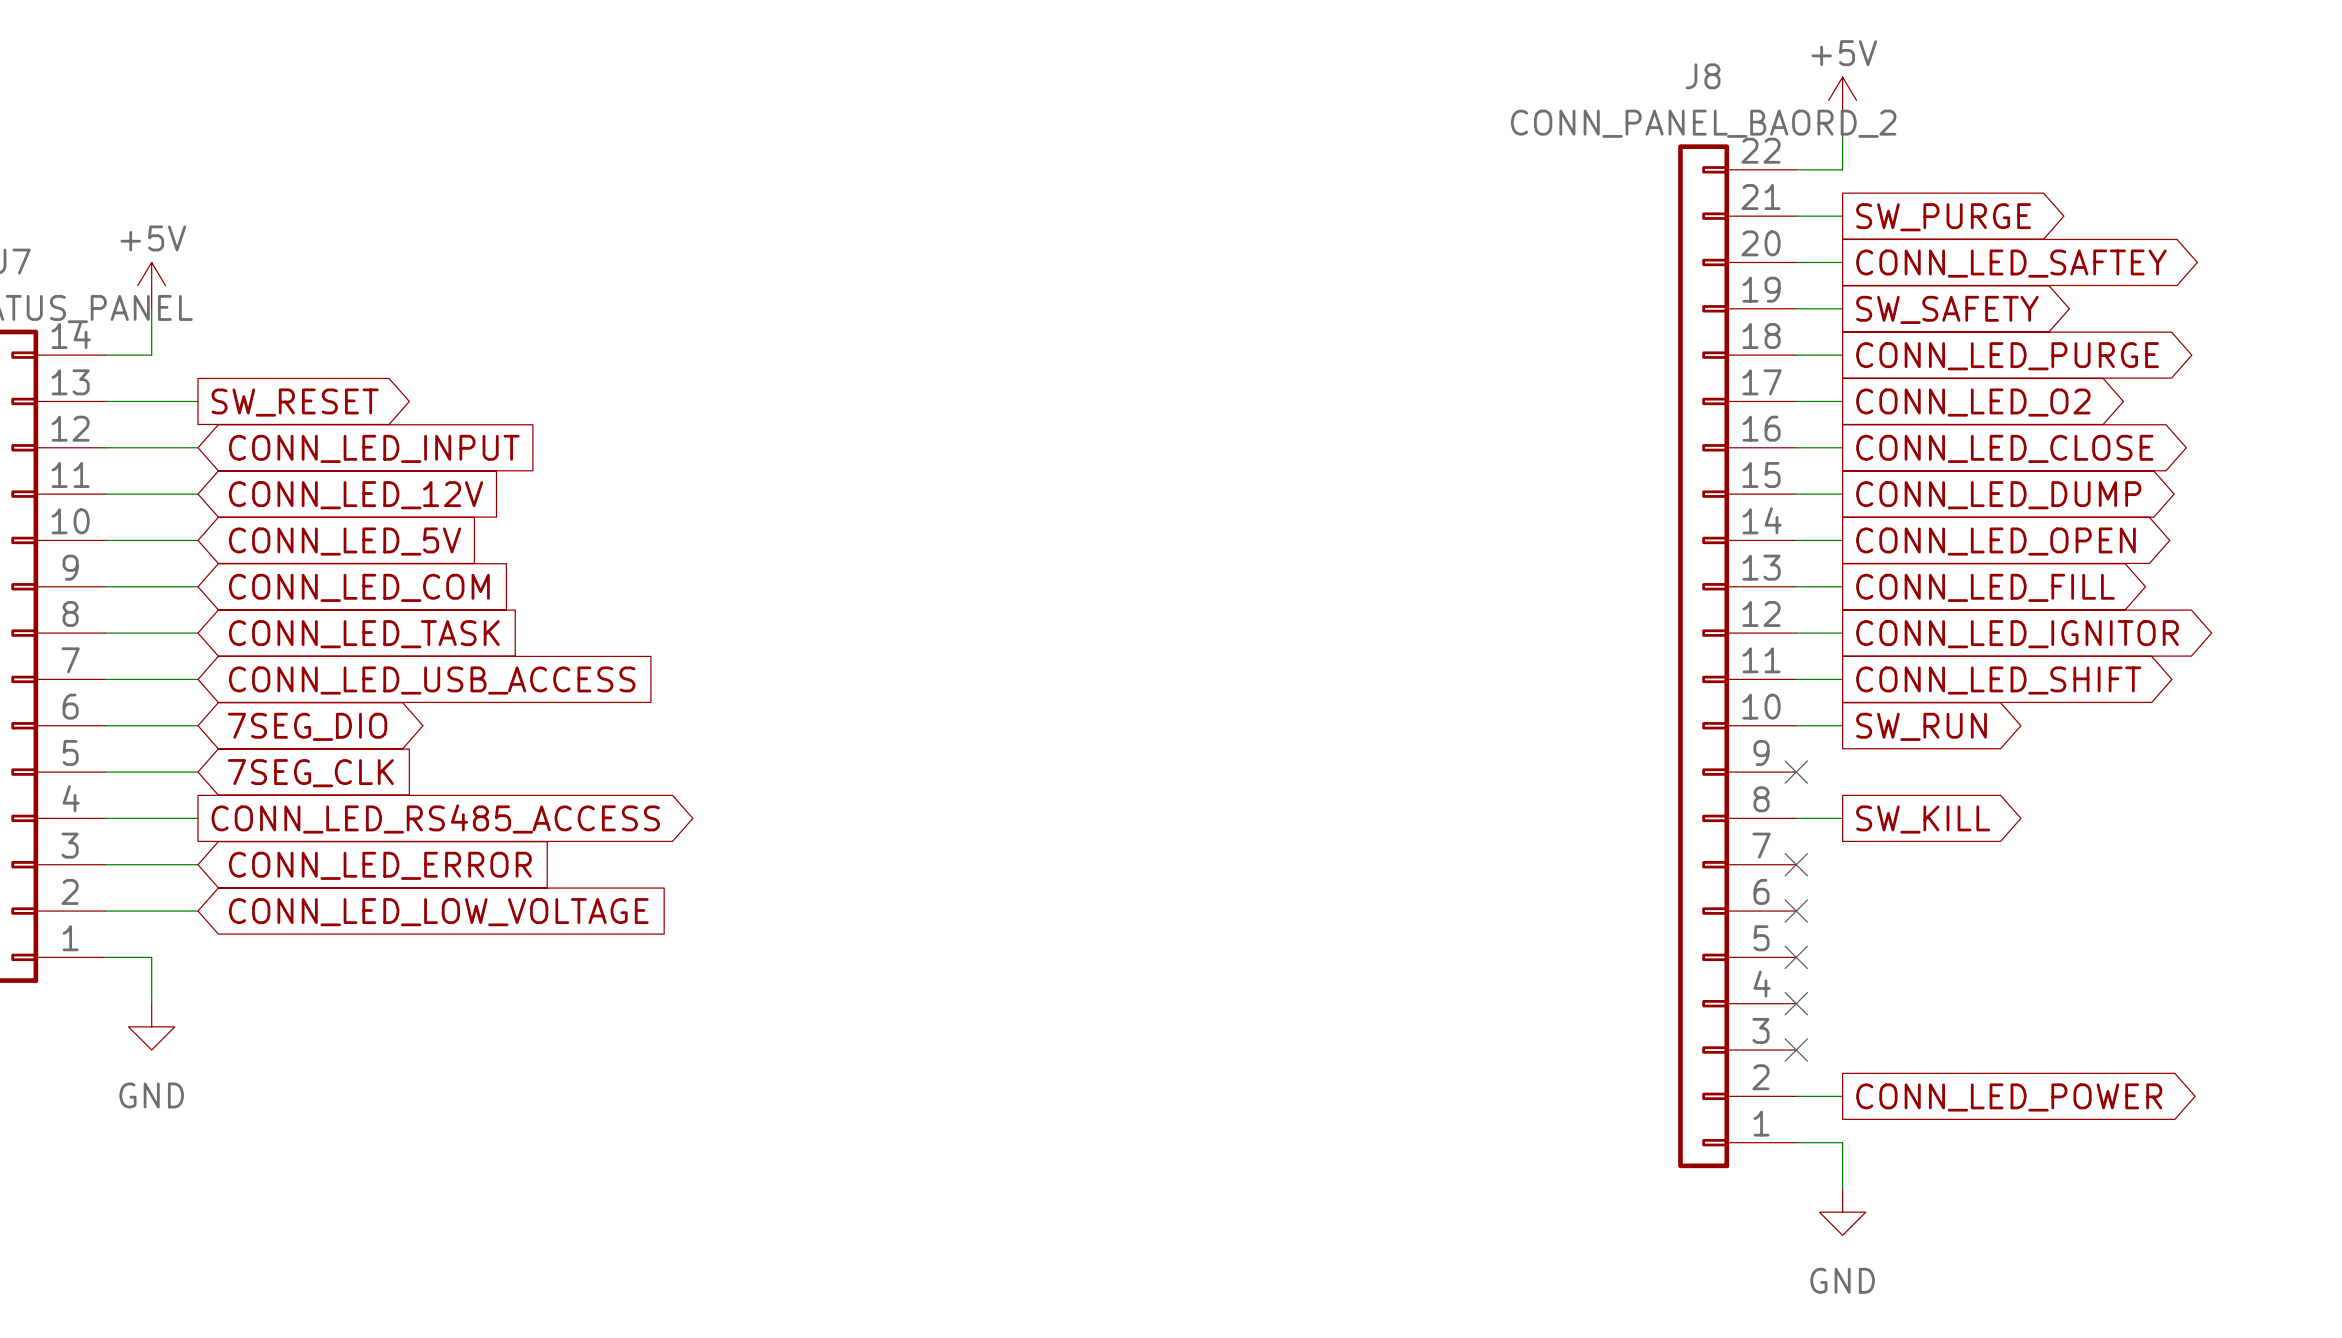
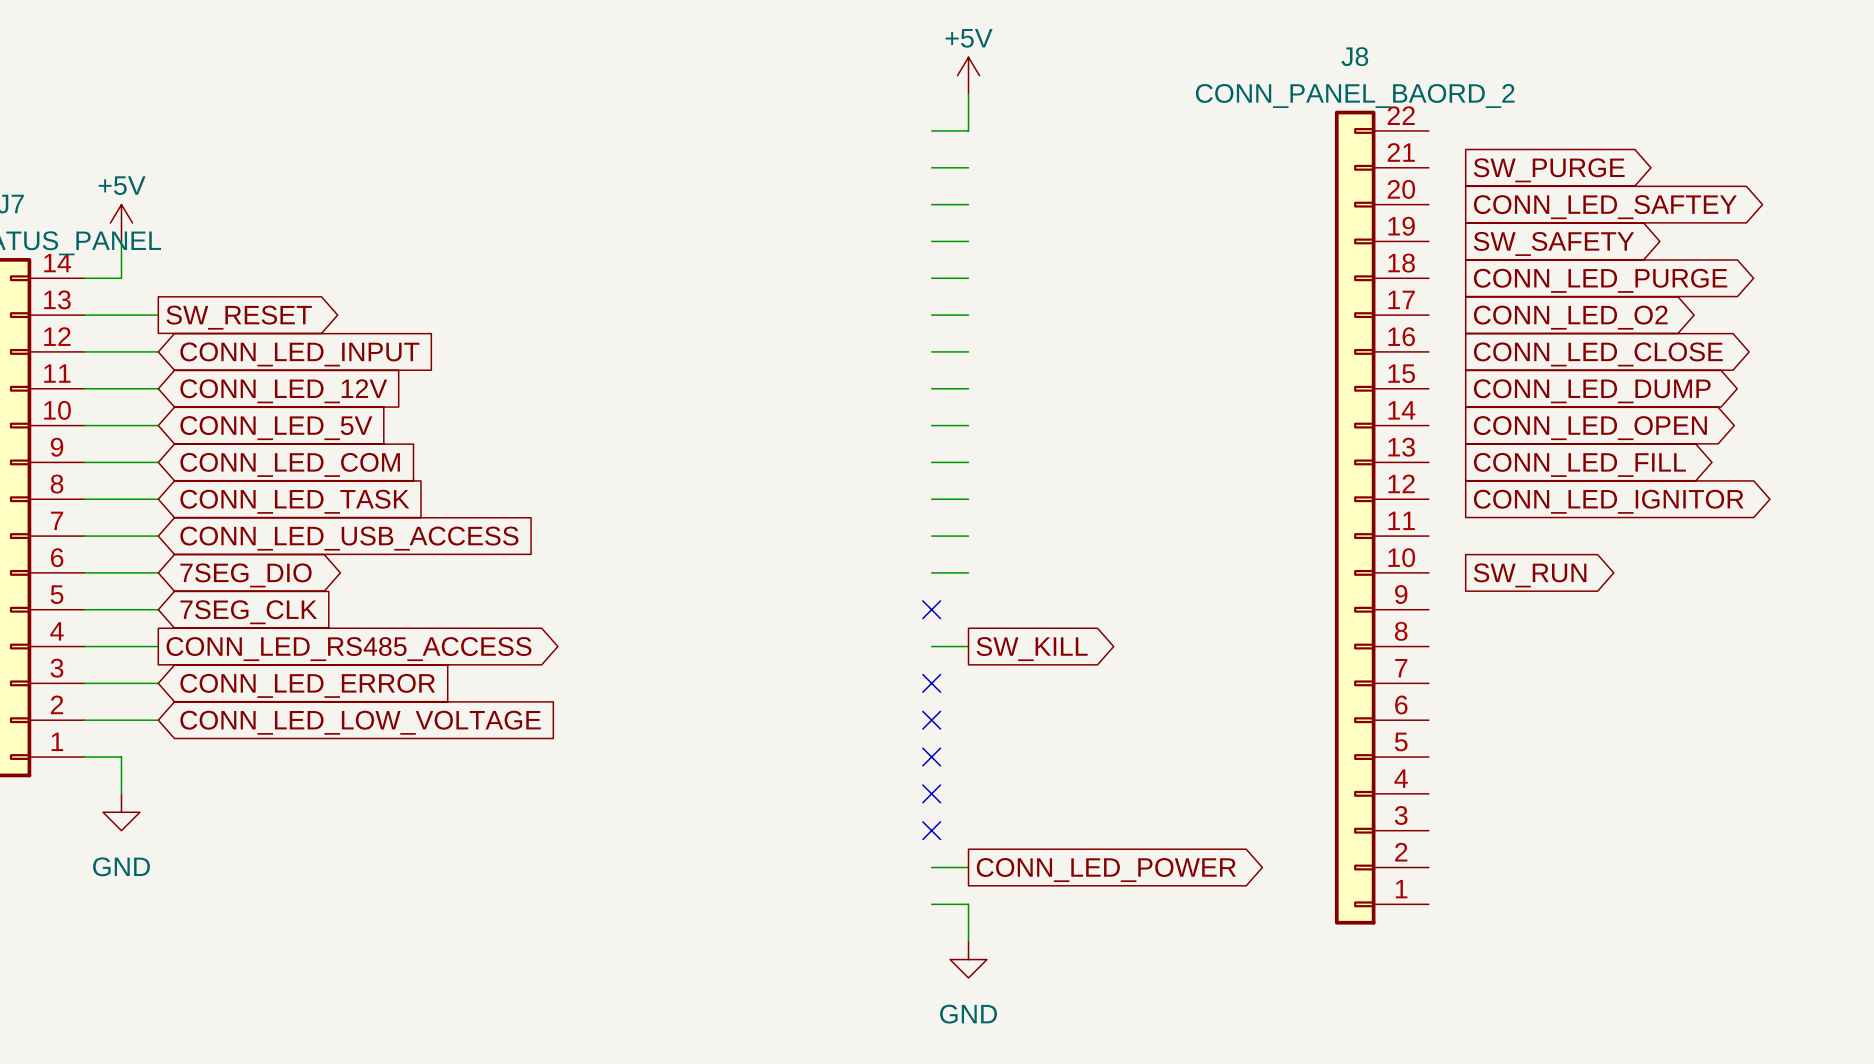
power symbol: none -> +5V (968, 75)
power symbol: +5V (1842, 100) -> none
wire: none -> (968, 94) (968, 130) (931, 130)
wire: (1842, 123) (1842, 169) (1796, 169) -> none
wire: none -> (931, 167) (968, 167)
wire: (1796, 216) (1842, 216) -> none
wire: none -> (931, 204) (968, 204)
wire: (1796, 262) (1842, 262) -> none
wire: none -> (931, 241) (968, 241)
wire: (1796, 308) (1842, 308) -> none
wire: none -> (931, 278) (968, 278)
wire: (1796, 355) (1842, 355) -> none
wire: none -> (931, 315) (968, 315)
wire: (1796, 401) (1842, 401) -> none
wire: none -> (931, 351) (968, 351)
wire: (1796, 447) (1842, 447) -> none
wire: none -> (931, 388) (968, 388)
wire: (1796, 494) (1842, 494) -> none
wire: none -> (931, 425) (968, 425)
wire: (1796, 540) (1842, 540) -> none
wire: none -> (931, 462) (968, 462)
wire: (1796, 586) (1842, 586) -> none
wire: none -> (931, 499) (968, 499)
wire: (1796, 633) (1842, 633) -> none
wire: none -> (931, 536) (968, 536)
wire: (1796, 679) (1842, 679) -> none
global label: CONN_LED_SHIFT (1998, 680) -> none
wire: none -> (931, 572) (968, 572)
wire: (1796, 725) (1842, 725) -> none
no-connect mark: none -> (931, 609)
no-connect mark: (1796, 772) -> none
wire: none -> (931, 646) (968, 646)
wire: (1796, 818) (1842, 818) -> none
global label: none -> SW_KILL (1032, 649)
global label: SW_KILL (1923, 819) -> none
no-connect mark: none -> (931, 683)
no-connect mark: (1796, 864) -> none
no-connect mark: none -> (931, 720)
no-connect mark: (1796, 911) -> none
no-connect mark: none -> (931, 757)
no-connect mark: (1796, 957) -> none
no-connect mark: none -> (931, 793)
no-connect mark: (1796, 1003) -> none
no-connect mark: none -> (931, 830)
no-connect mark: (1796, 1050) -> none
wire: none -> (931, 867) (968, 867)
wire: (1796, 1096) (1842, 1096) -> none
global label: none -> CONN_LED_POWER (1106, 870)
global label: CONN_LED_POWER (2009, 1097) -> none
wire: none -> (931, 904) (968, 904) (968, 941)
wire: (1796, 1142) (1842, 1142) (1842, 1189) -> none
power symbol: none -> GND (968, 959)
power symbol: GND (1842, 1212) -> none

